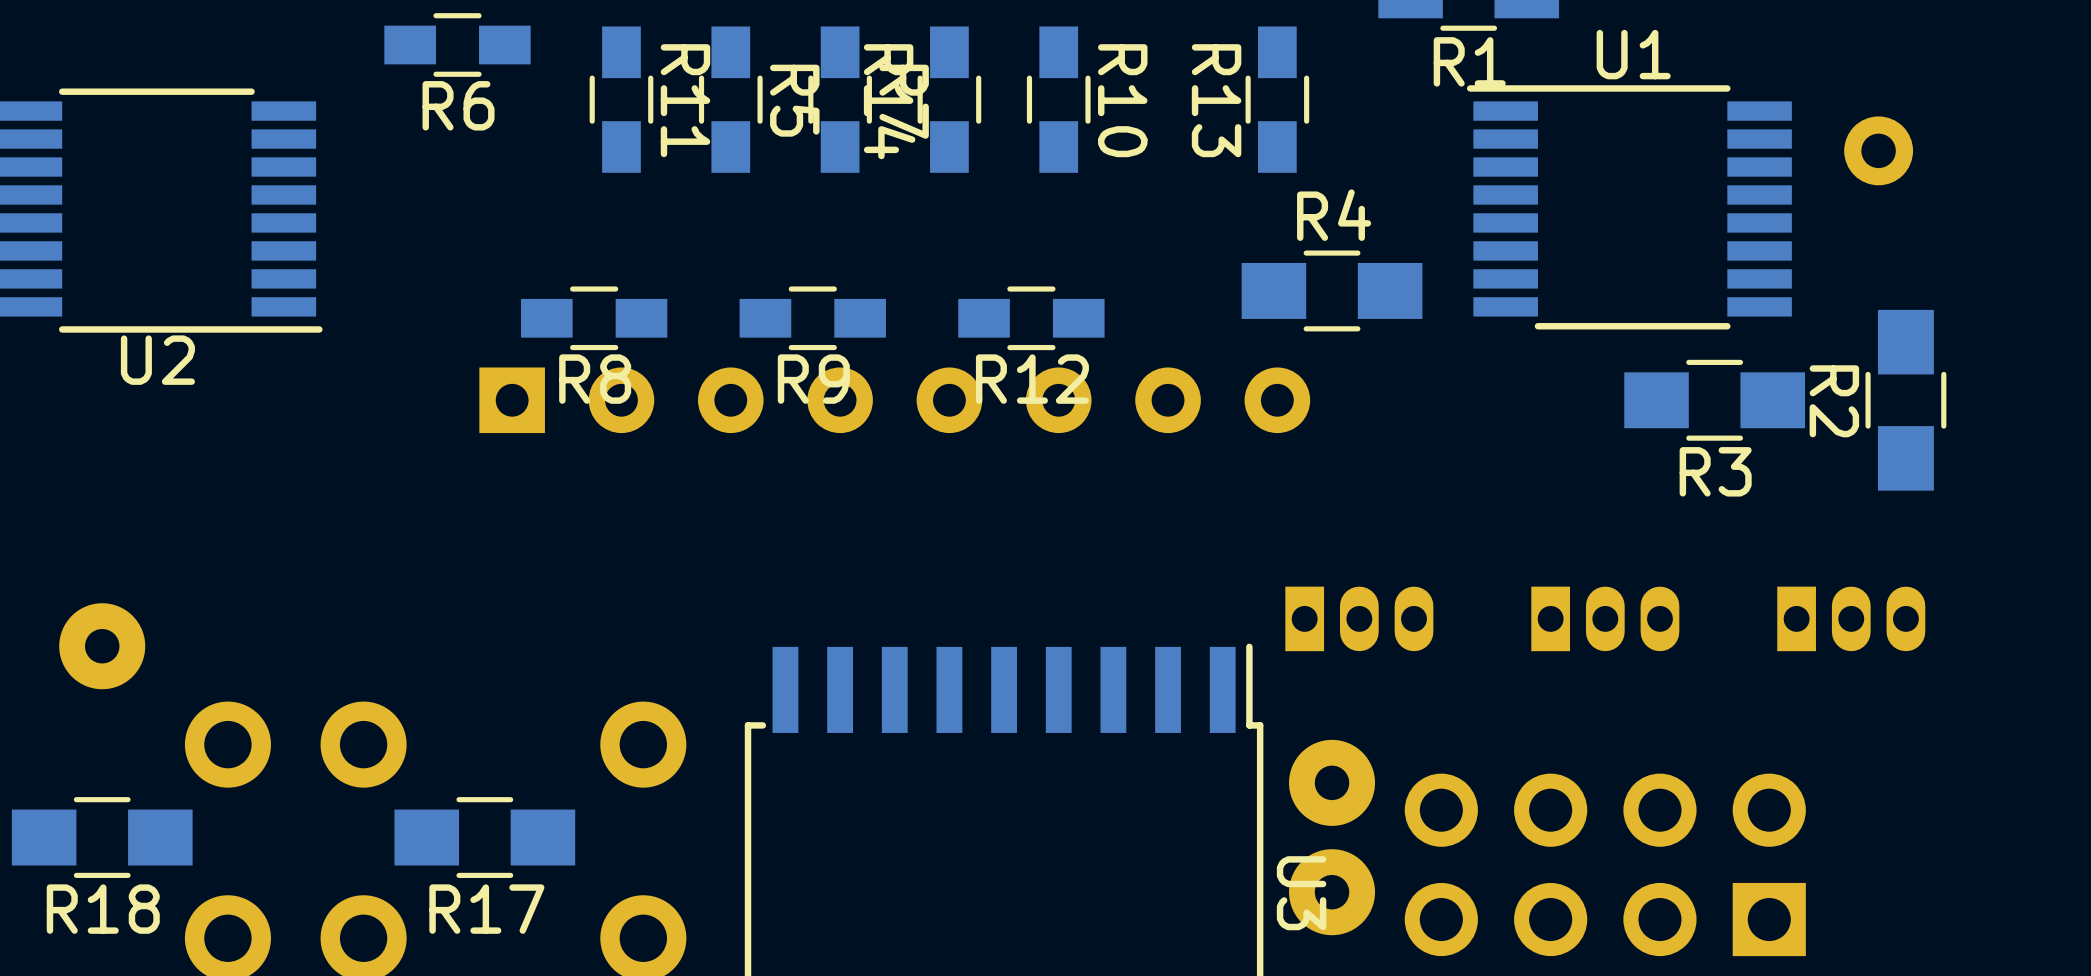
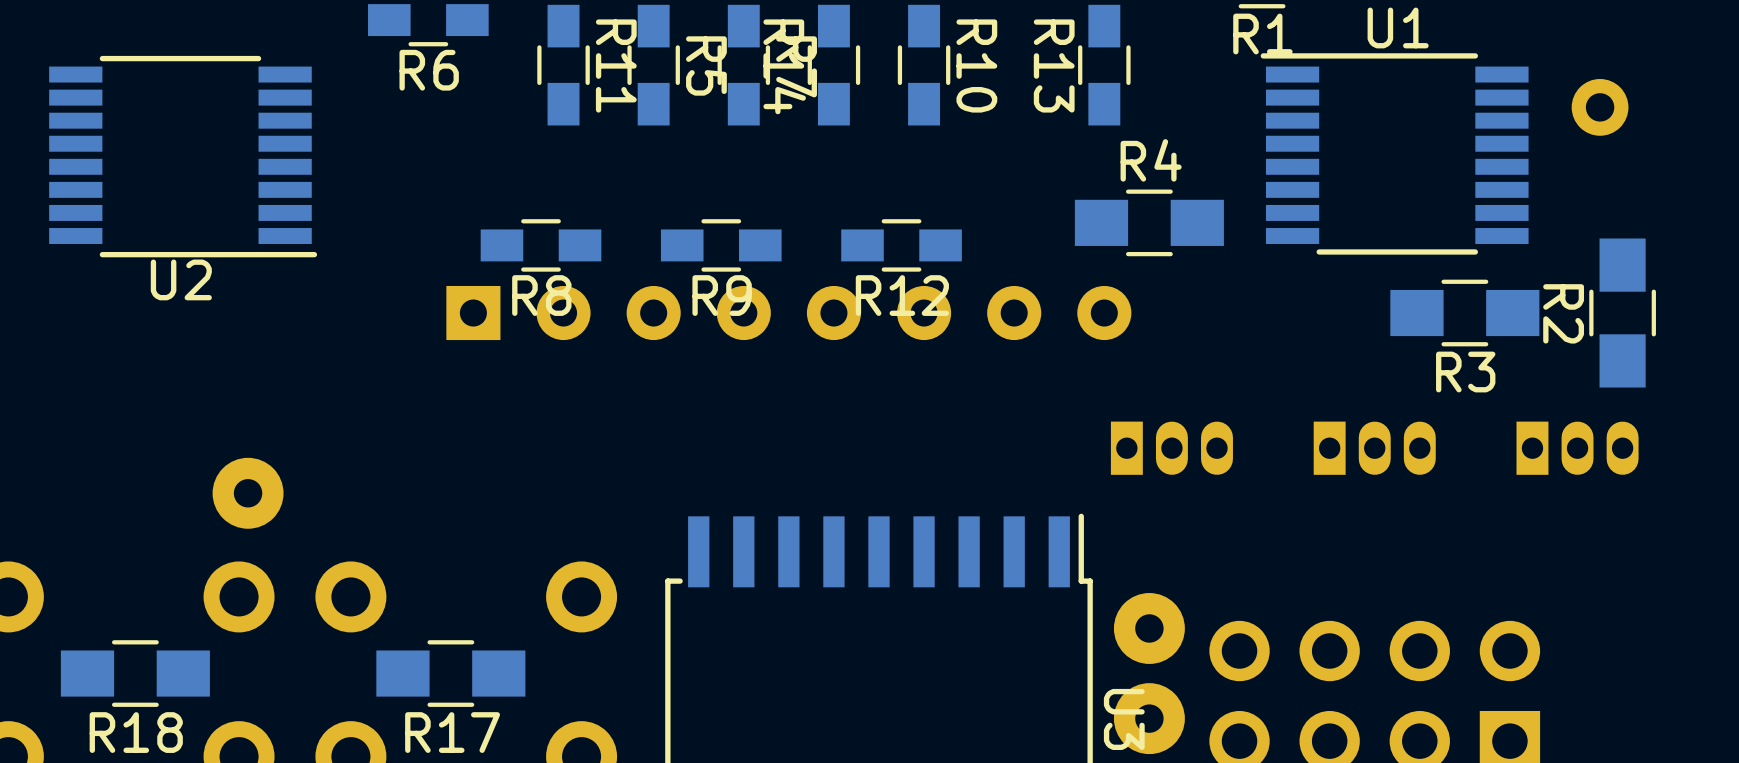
part position: (1359, 618) -> (1171, 448)
part position: (1605, 618) -> (1374, 448)
part position: (1851, 618) -> (1577, 448)
part position: (102, 646) -> (248, 493)

